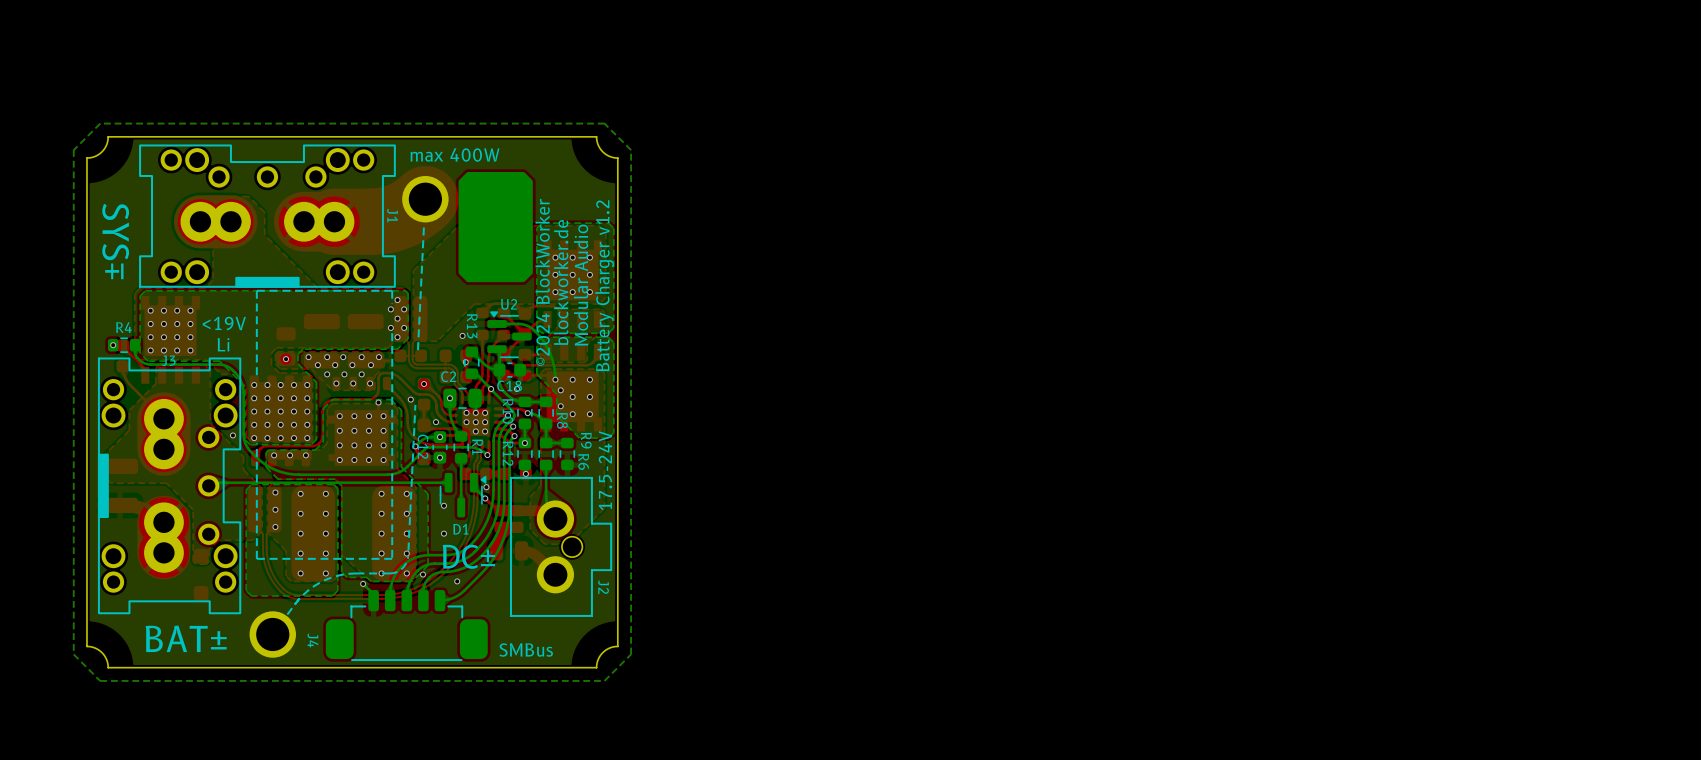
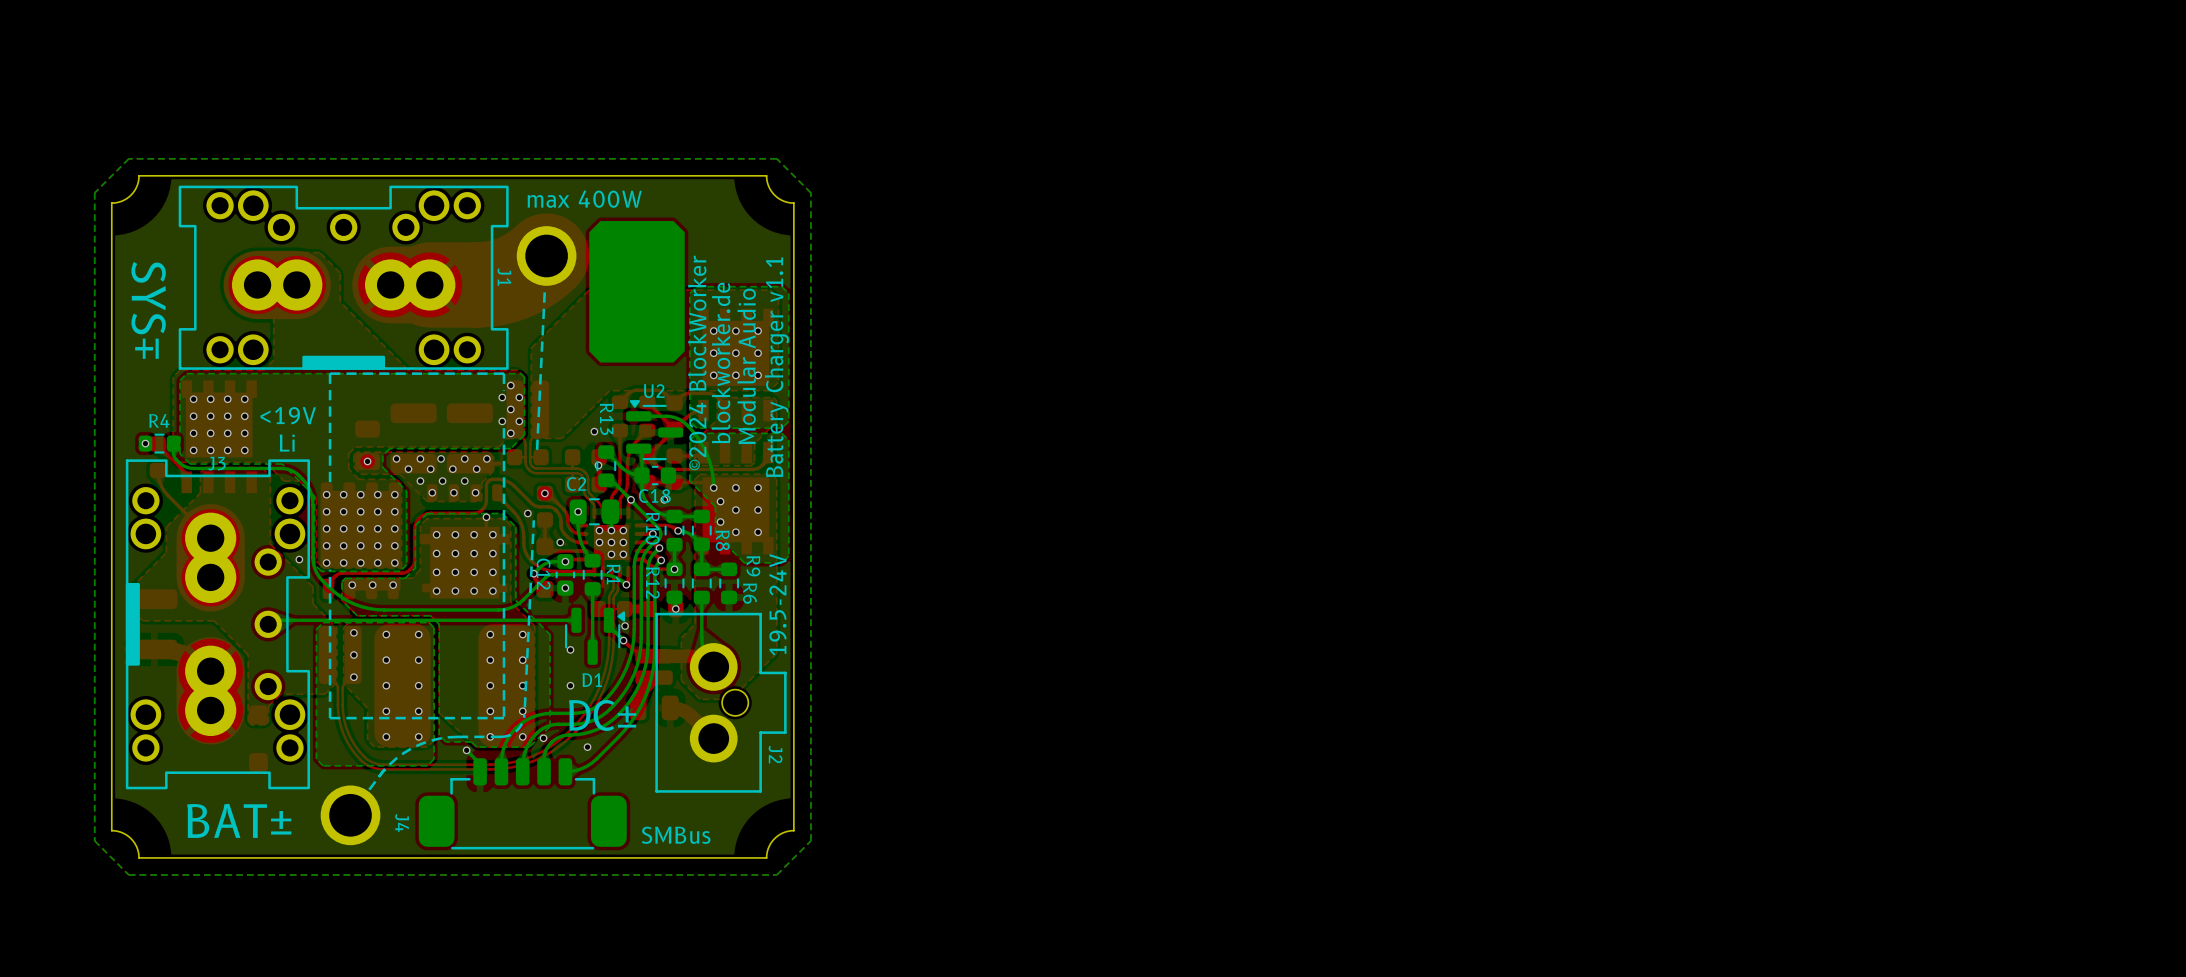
text: Battery Charger v1.2 (604, 285) -> Battery Charger v1.1 (776, 367)
text: 17.5-24V (605, 470) -> 19.5-24V (778, 604)

